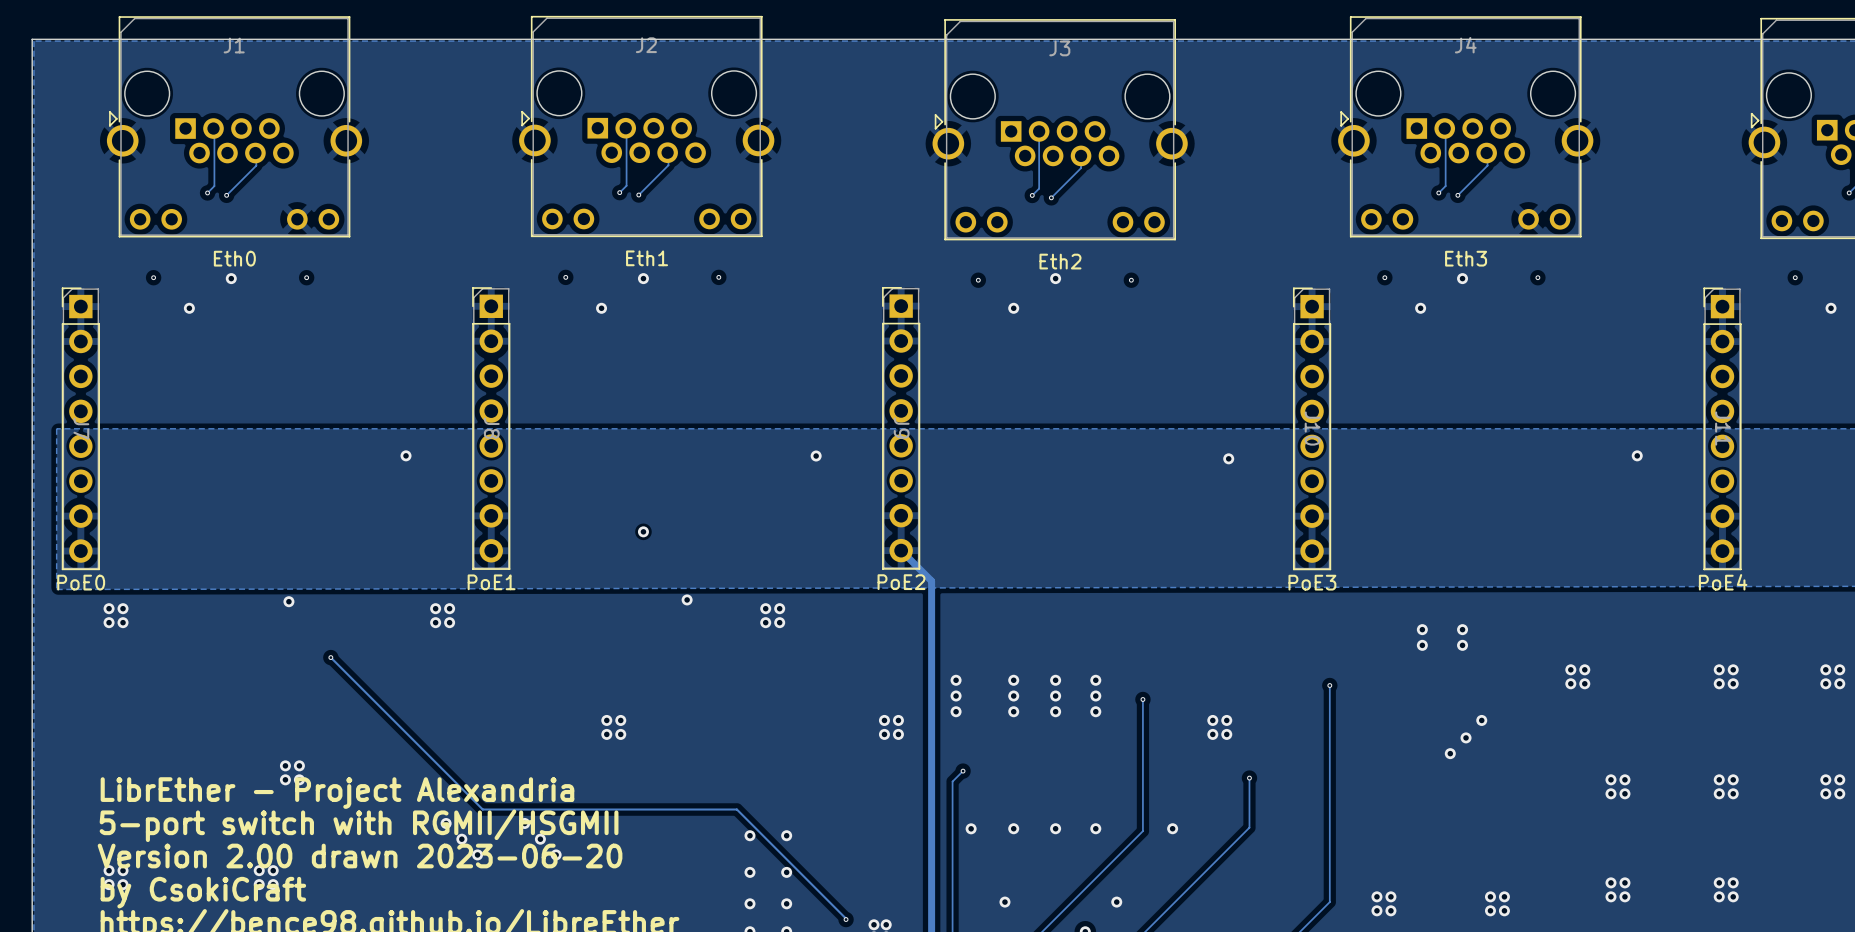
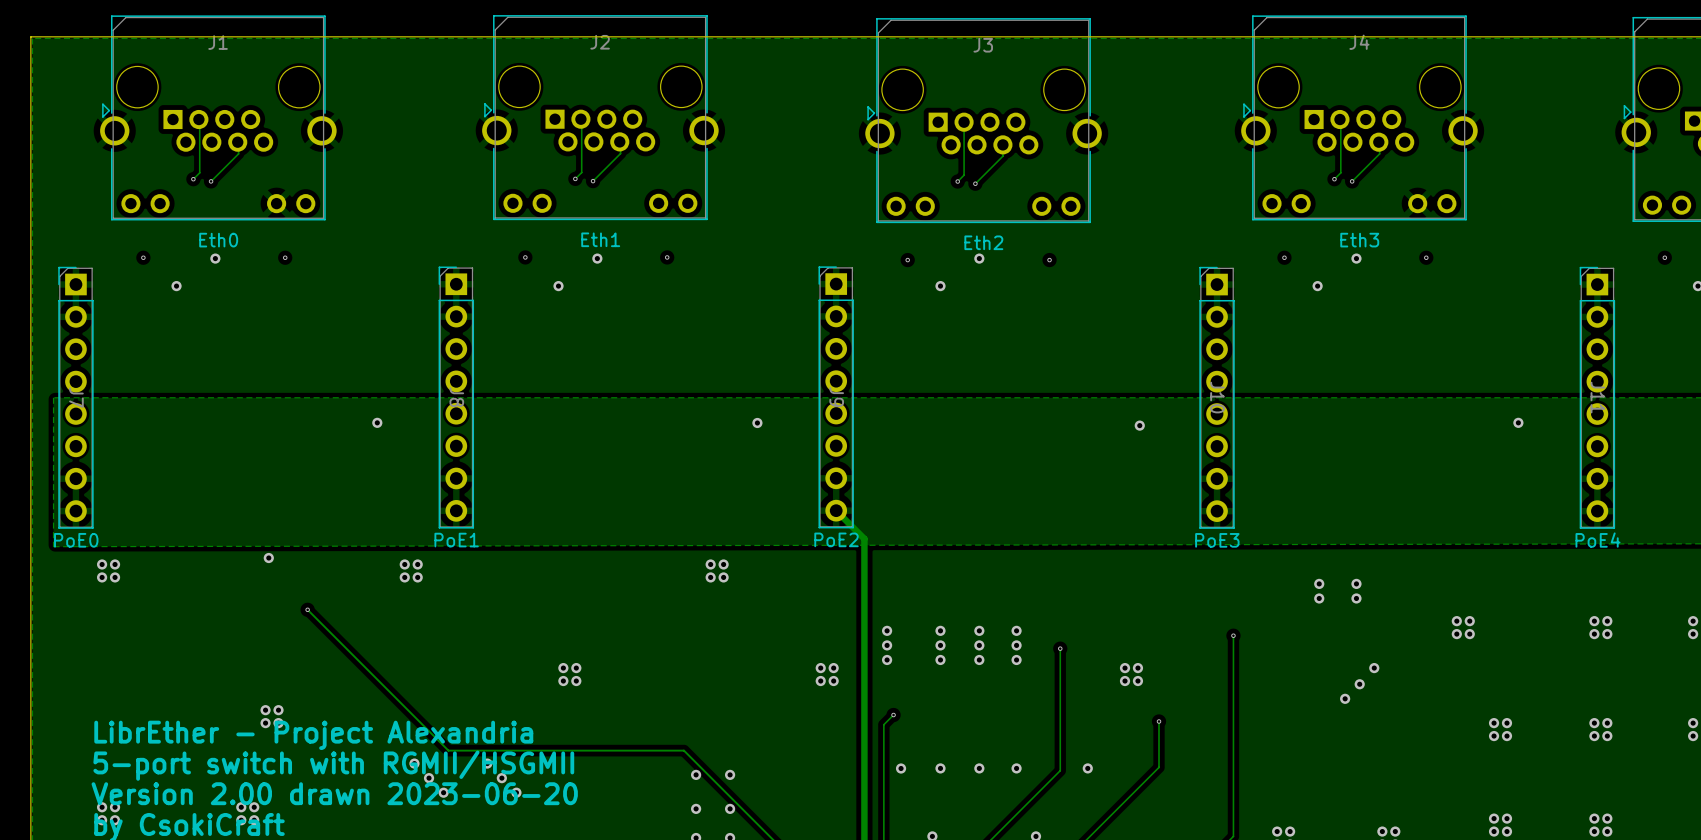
via: (643, 531) -> none
via: (687, 599) -> none

